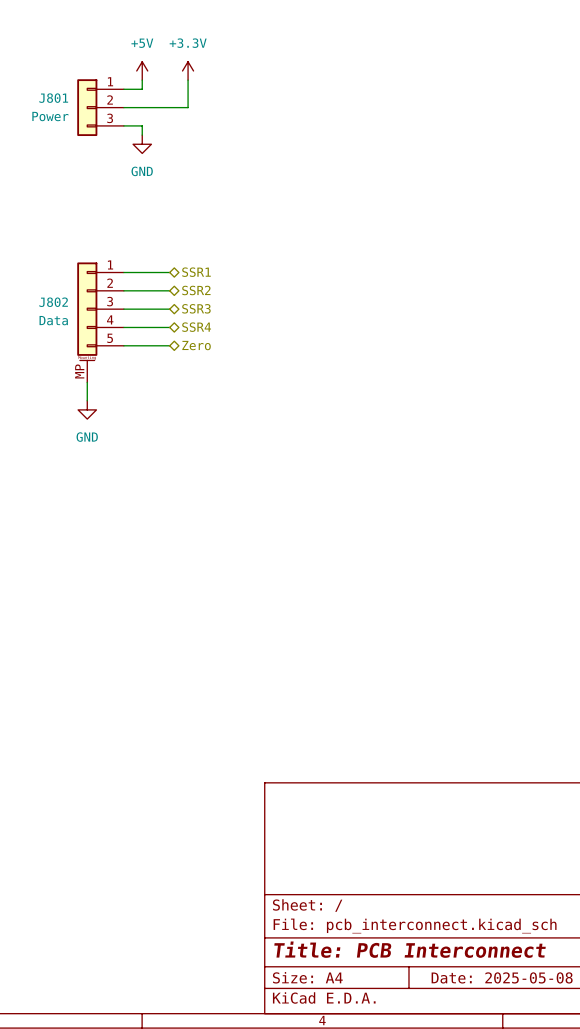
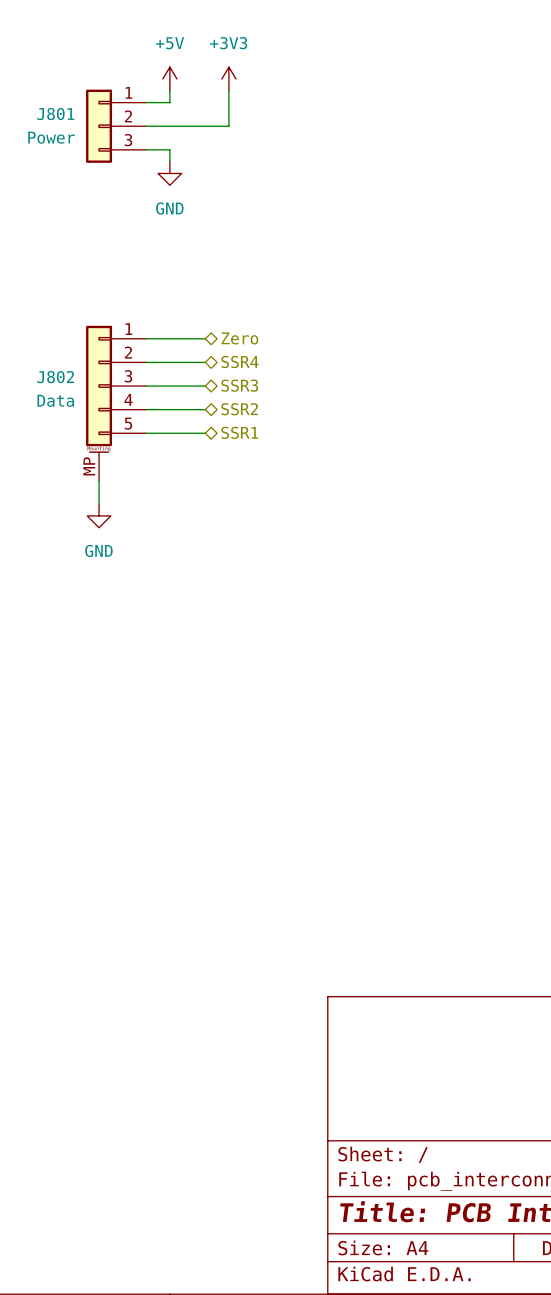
power symbol: +3.3V (188, 70) -> +3V3 (228, 79)
hierarchical label: SSR1 (196, 272) -> Zero (239, 338)
hierarchical label: SSR2 (196, 290) -> SSR4 (239, 361)
hierarchical label: SSR4 (196, 327) -> SSR2 (239, 409)
hierarchical label: Zero (196, 345) -> SSR1 (239, 432)

